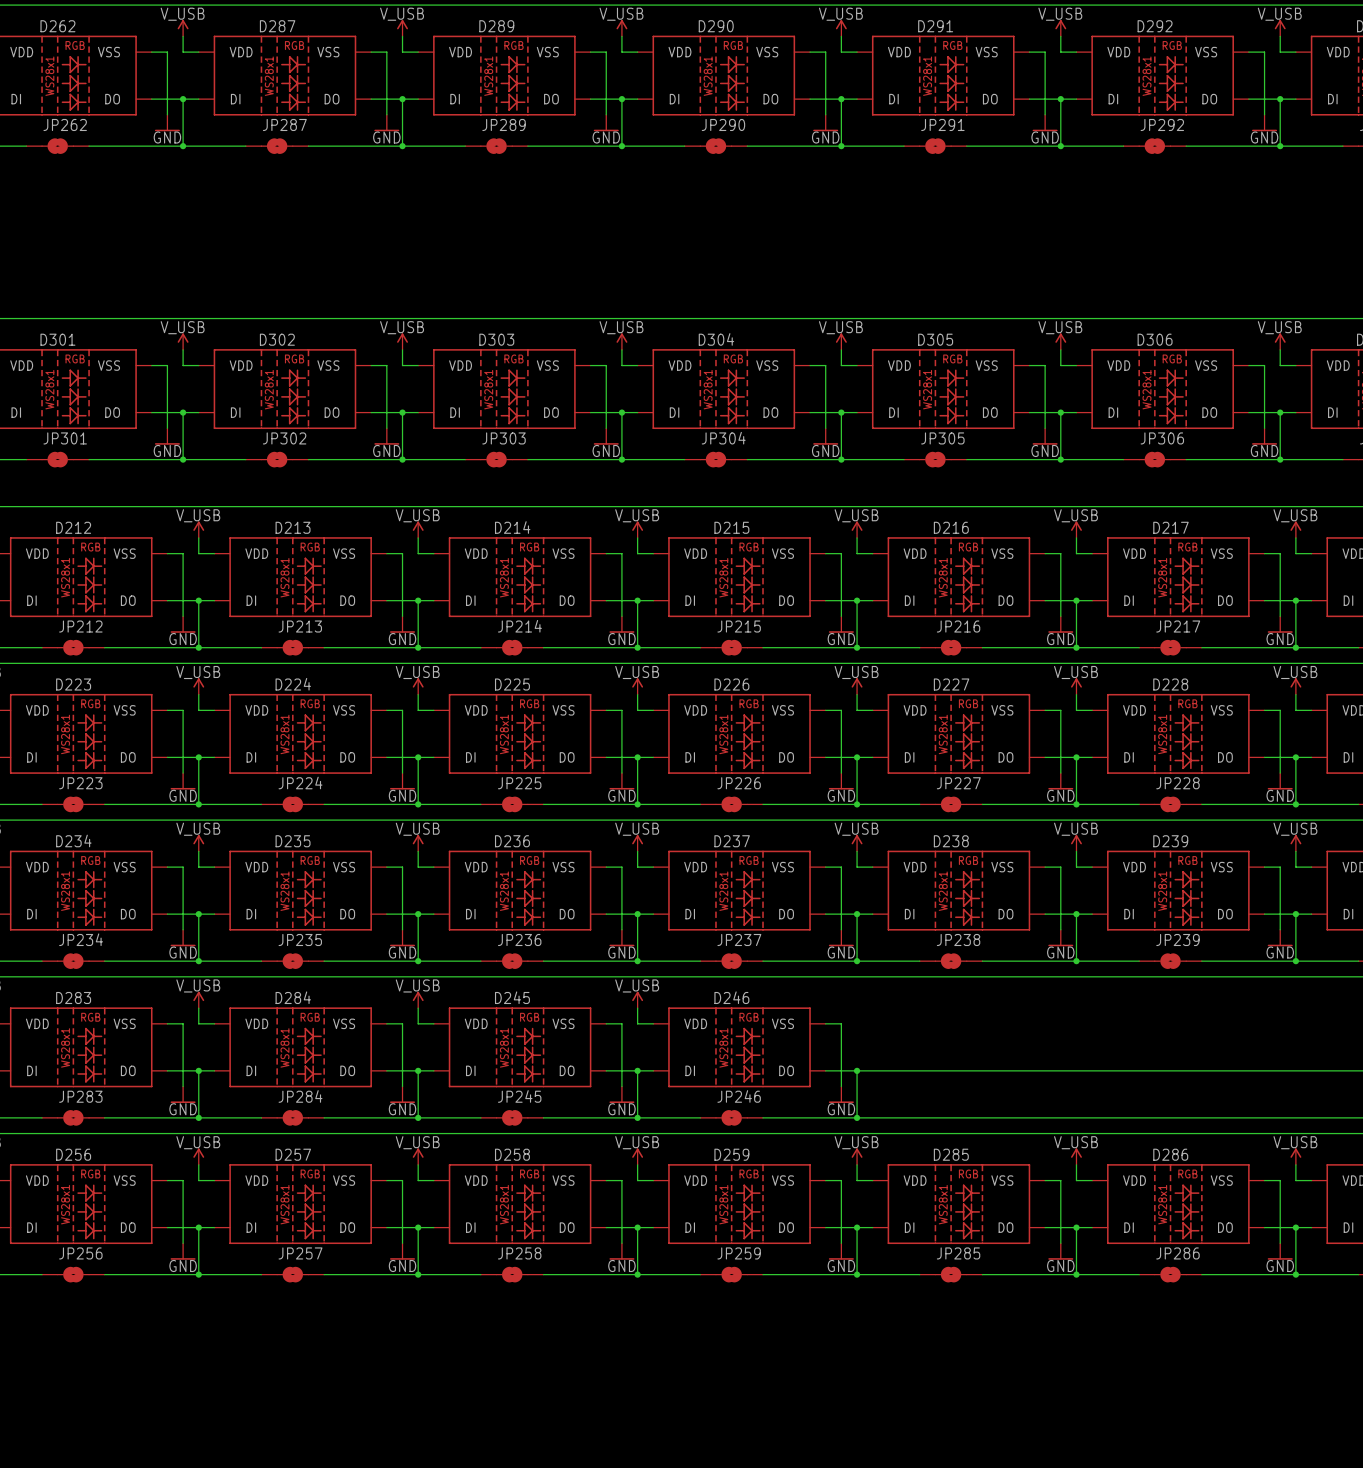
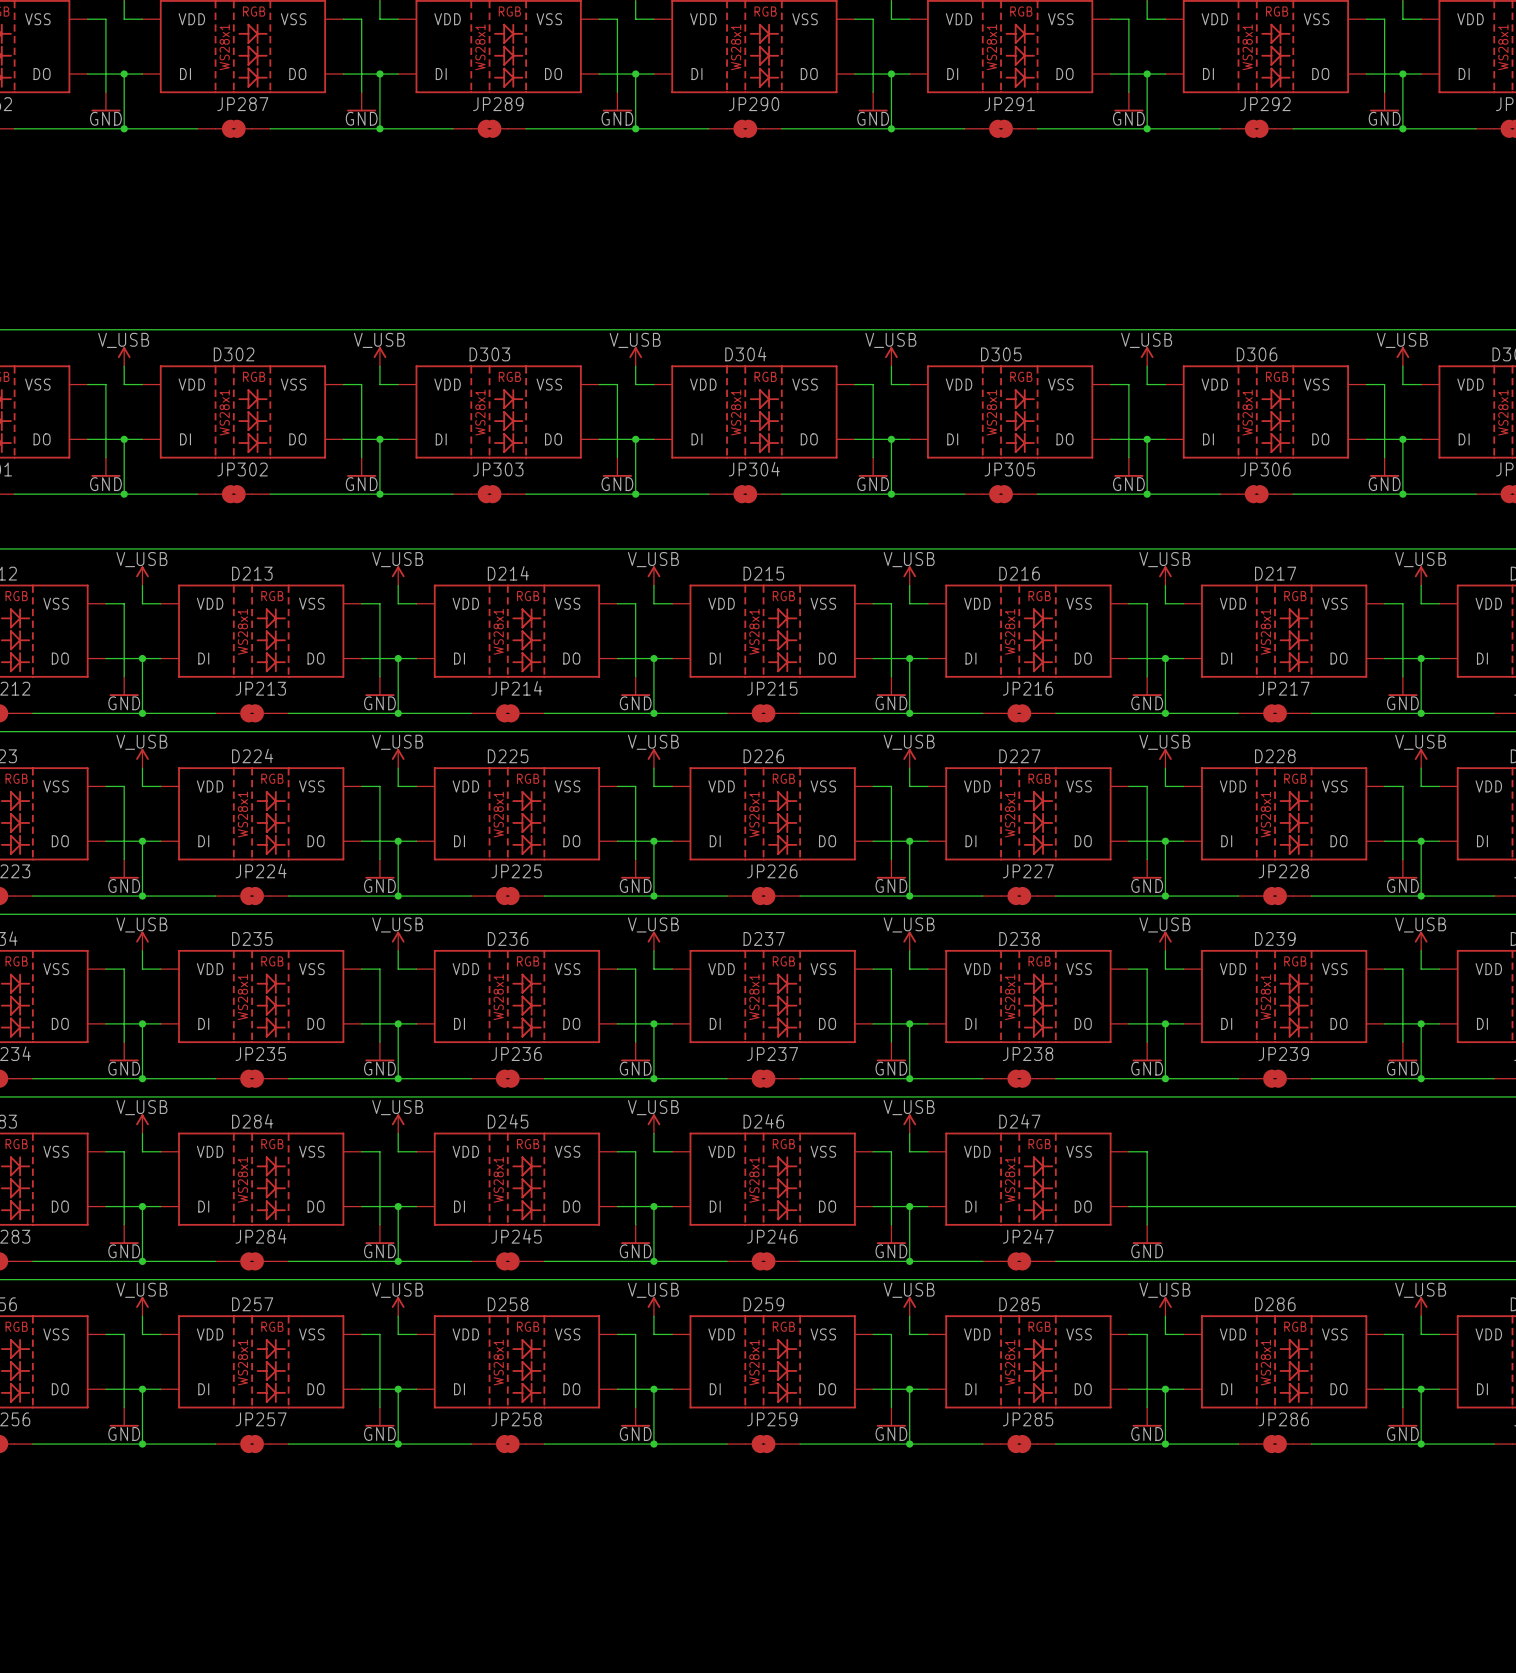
power symbol: none -> V_USB (909, 1123)
wire: none -> (909, 1133) (909, 1151) (927, 1151)
wire: none -> (1128, 1151) (1147, 1151) (1147, 1224)
D247: none -> (1028, 1179)
wire: (872, 1070) (1045, 1070) -> none
power symbol: none -> GND (1147, 1234)
JP247: none -> (1019, 1261)

